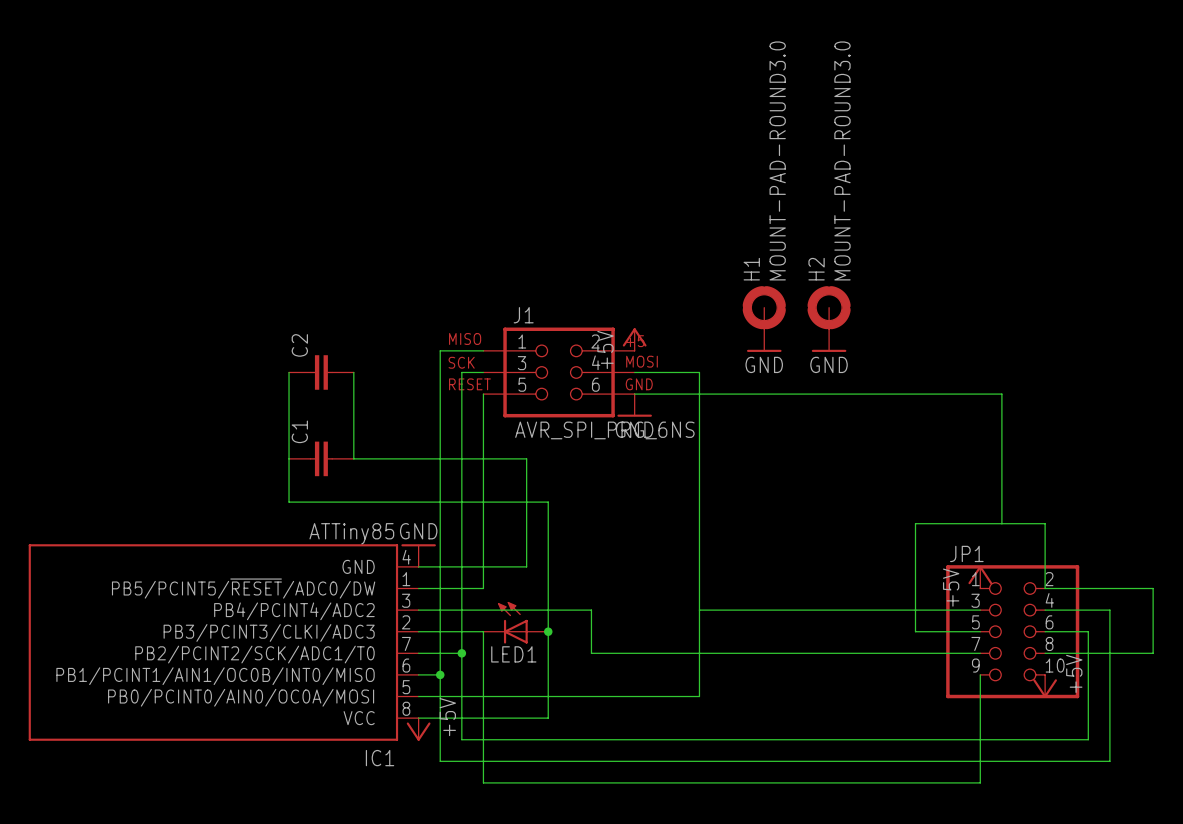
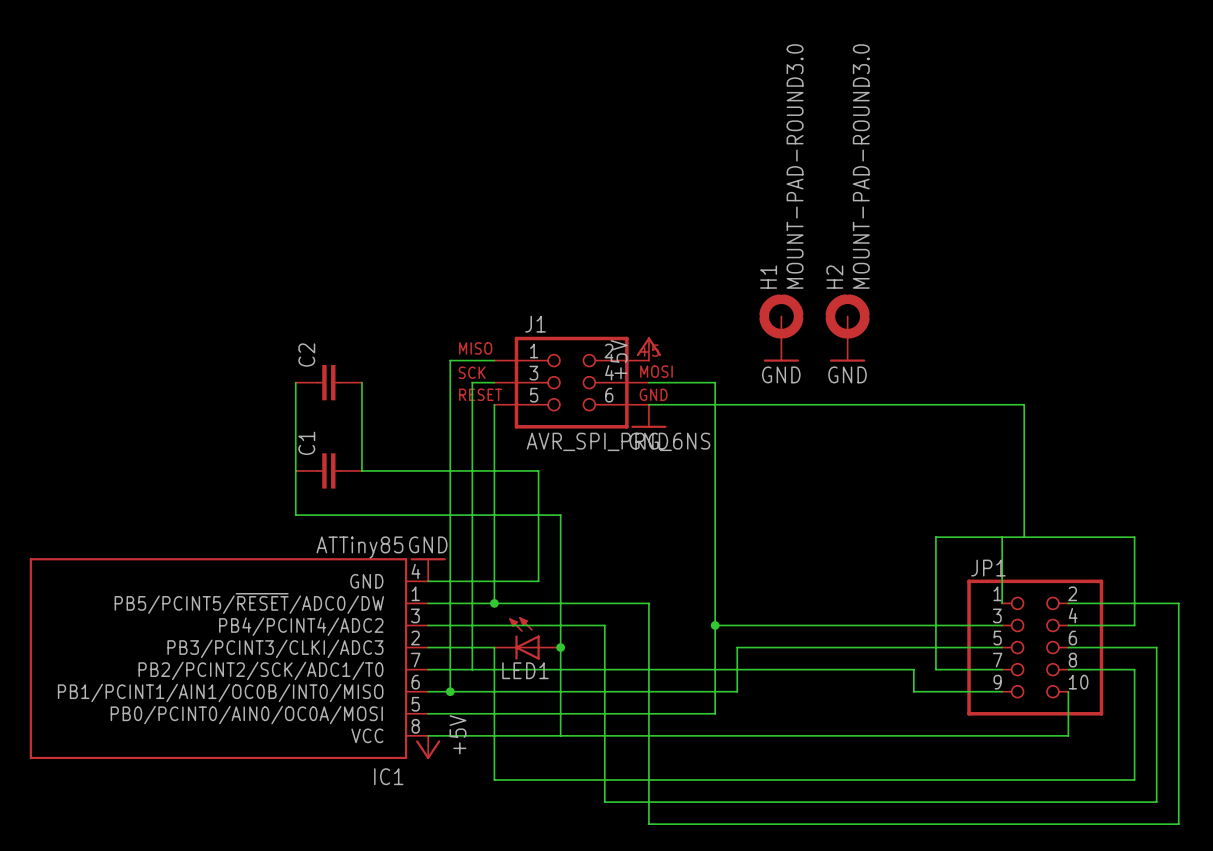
wire: none -> (1002, 537) (1002, 603)
wire: (1045, 523) (1045, 588) -> (1068, 537) (1134, 537) (1134, 625)
power symbol: +5V (980, 577) -> none
junction: none -> (494, 603)
junction: none -> (715, 625)
wire: (1109, 610) (1109, 653) (1153, 653) -> (494, 603) (648, 603) (648, 824) (1178, 824) (1178, 669)
wire: (1088, 631) (1088, 739) (461, 739) (461, 653) -> none
junction: (461, 653) -> none
wire: (893, 653) (915, 653) -> (913, 669) (913, 691) (1002, 691)
wire: none -> (935, 669) (935, 647) (737, 647) (737, 691) (450, 691)
wire: (440, 674) (440, 761) (483, 761) (483, 782) (591, 782) -> (472, 669) (604, 669) (604, 802)
wire: (980, 674) (980, 782) -> (1112, 647) (1156, 647) (1156, 802) (1002, 802)
wire: none -> (1068, 691) (1068, 735) (560, 735)
power symbol: +5V (1045, 686) -> none

